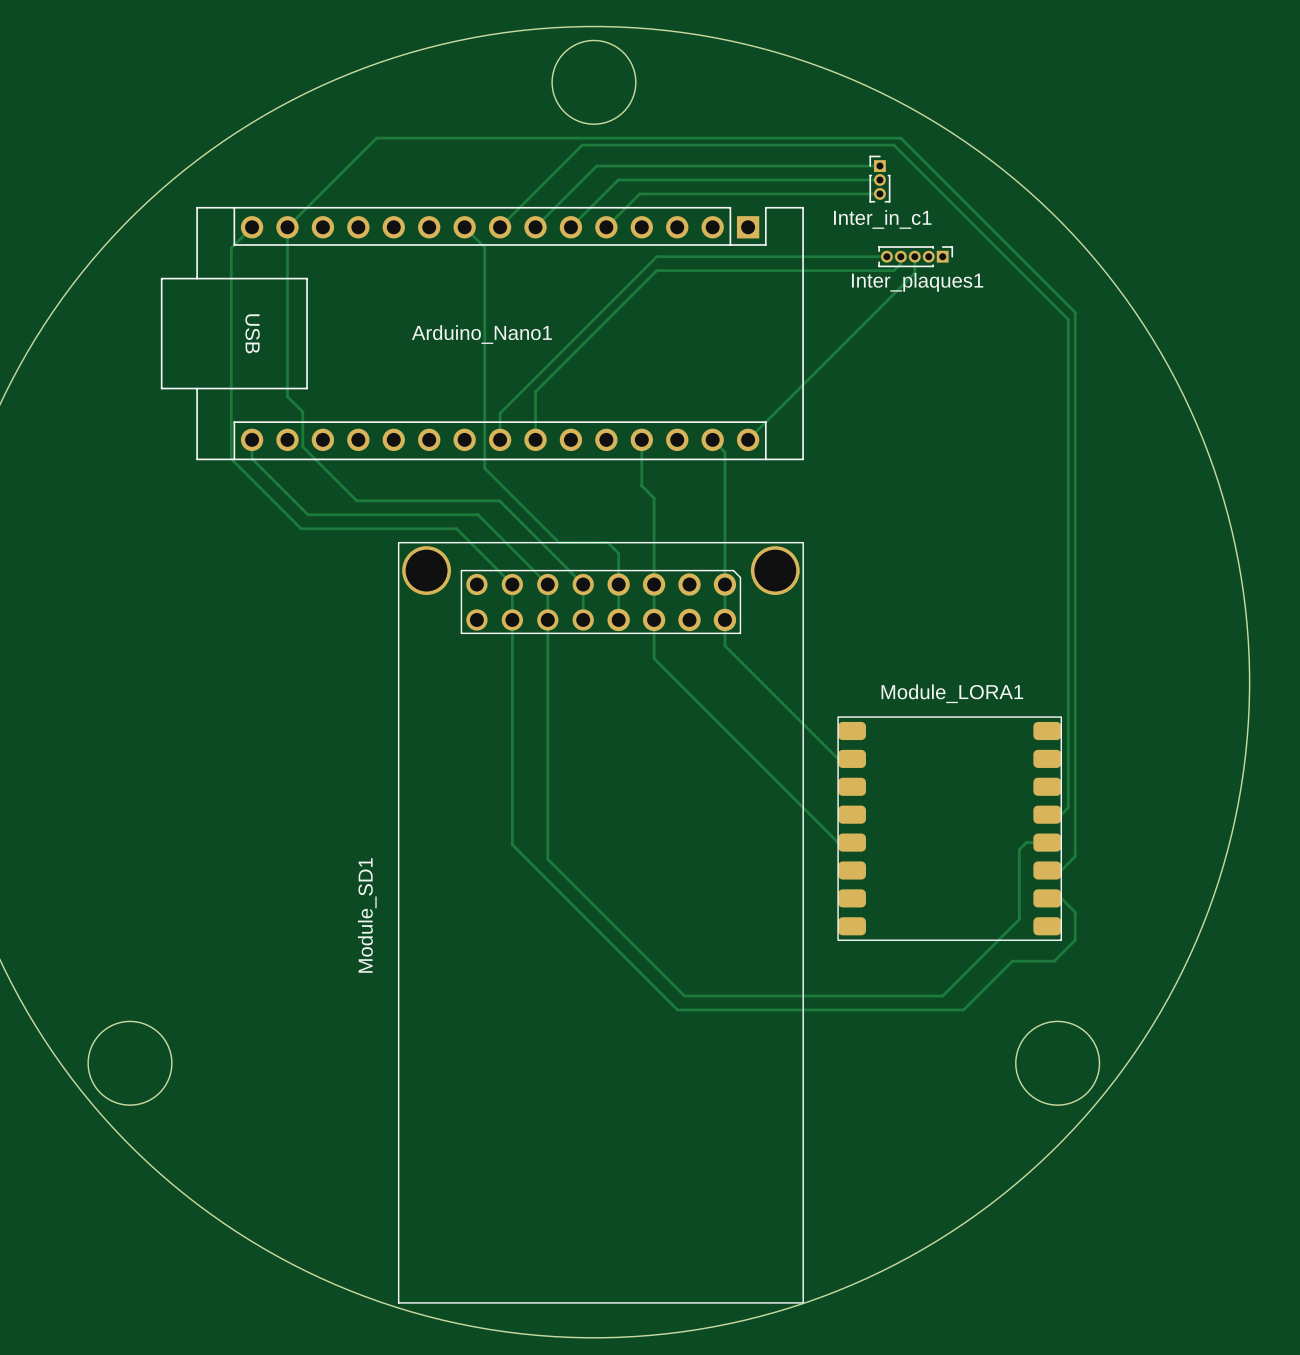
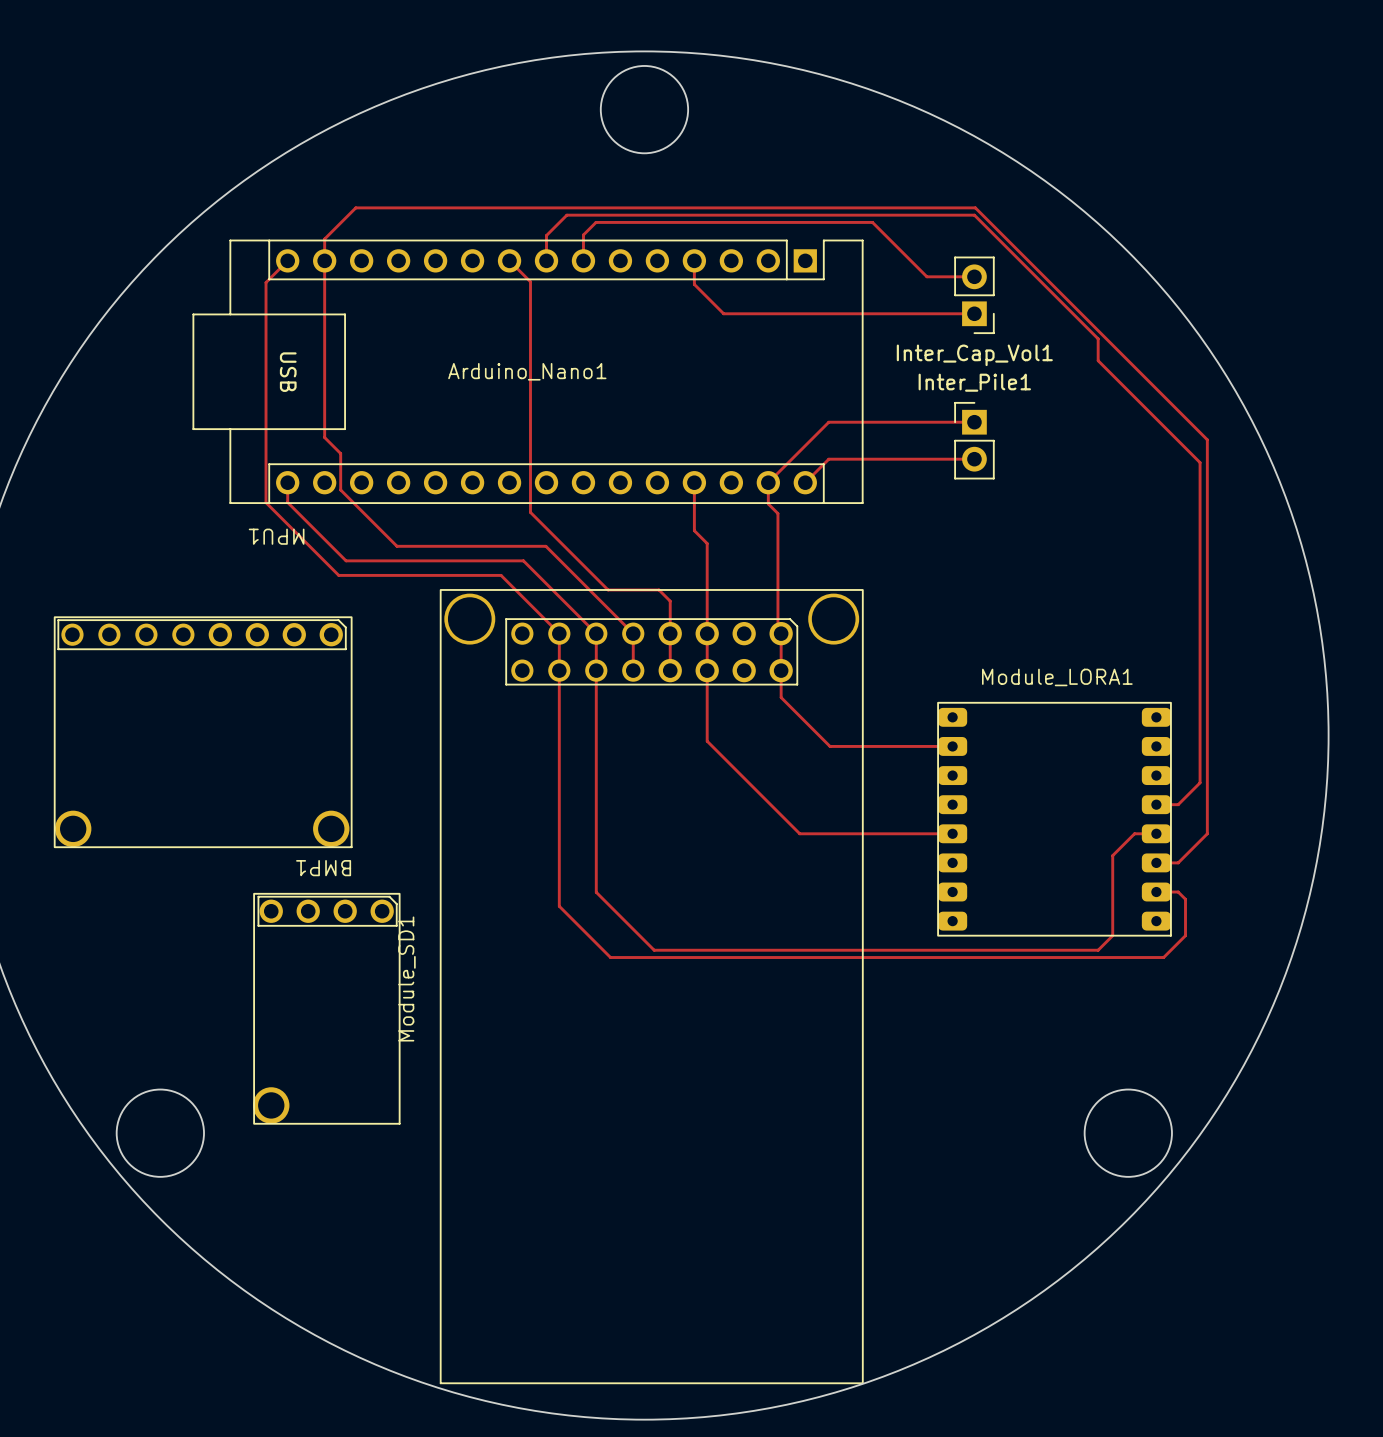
track: (879, 166) (596, 166) (535, 227) -> (974, 276) (926, 276) (872, 222) (595, 222) (583, 234) (583, 260)
track: (879, 179) (618, 179) (570, 227) -> none
Inter_in_c1: (879, 179) -> none
track: (879, 193) (639, 193) (606, 227) -> none
track: (287, 227) (376, 138) (900, 138) (1075, 312) (1075, 856) (1061, 870) (1047, 870) -> (324, 260) (324, 239) (355, 207) (975, 207) (1207, 439) (1207, 833) (1178, 862) (1156, 862)
track: (500, 227) (582, 145) (893, 145) (1068, 319) (1068, 807) (1061, 814) (1047, 814) -> (546, 260) (546, 235) (566, 215) (974, 215) (1098, 338) (1098, 360) (1200, 462) (1200, 782) (1178, 804) (1156, 804)
track: none -> (694, 260) (694, 284) (723, 313) (974, 313)
track: (886, 256) (656, 256) (500, 413) (500, 439) -> none
track: (900, 256) (900, 263) (893, 270) (656, 270) (535, 391) (535, 439) -> none
track: (914, 256) (914, 273) (770, 417) -> (974, 459) (828, 459)
Inter_plaques1: (915, 256) -> none
Inter_Cap_Vol1: none -> (974, 295)
track: none -> (974, 422) (828, 422) (768, 482) (768, 503) (777, 513) (777, 629)
Inter_Pile1: none -> (974, 440)
track: (712, 439) (724, 452) (724, 584) -> none
track: (654, 658) (838, 842) (852, 842) -> (707, 710) (707, 741) (799, 833) (952, 833)
MPU1: none -> (203, 732)
track: (771, 692) (838, 758) (852, 758) -> (830, 746) (952, 746)
Module_LORA1 footprint: [837, 716, 1062, 941] -> [937, 702, 1172, 937]
track: (547, 832) (547, 859) (684, 996) (942, 996) (1019, 919) (1019, 849) (1026, 842) (1047, 842) -> (596, 892) (654, 950) (1098, 950) (1112, 935) (1112, 855) (1134, 833) (1156, 833)
track: (512, 844) (677, 1009) (963, 1009) (1012, 961) (1054, 961) (1075, 940) (1075, 912) (1061, 898) (1047, 898) -> (559, 905) (610, 957) (1163, 957) (1185, 935) (1185, 899) (1178, 892) (1156, 892)
BMP1: none -> (326, 1008)

